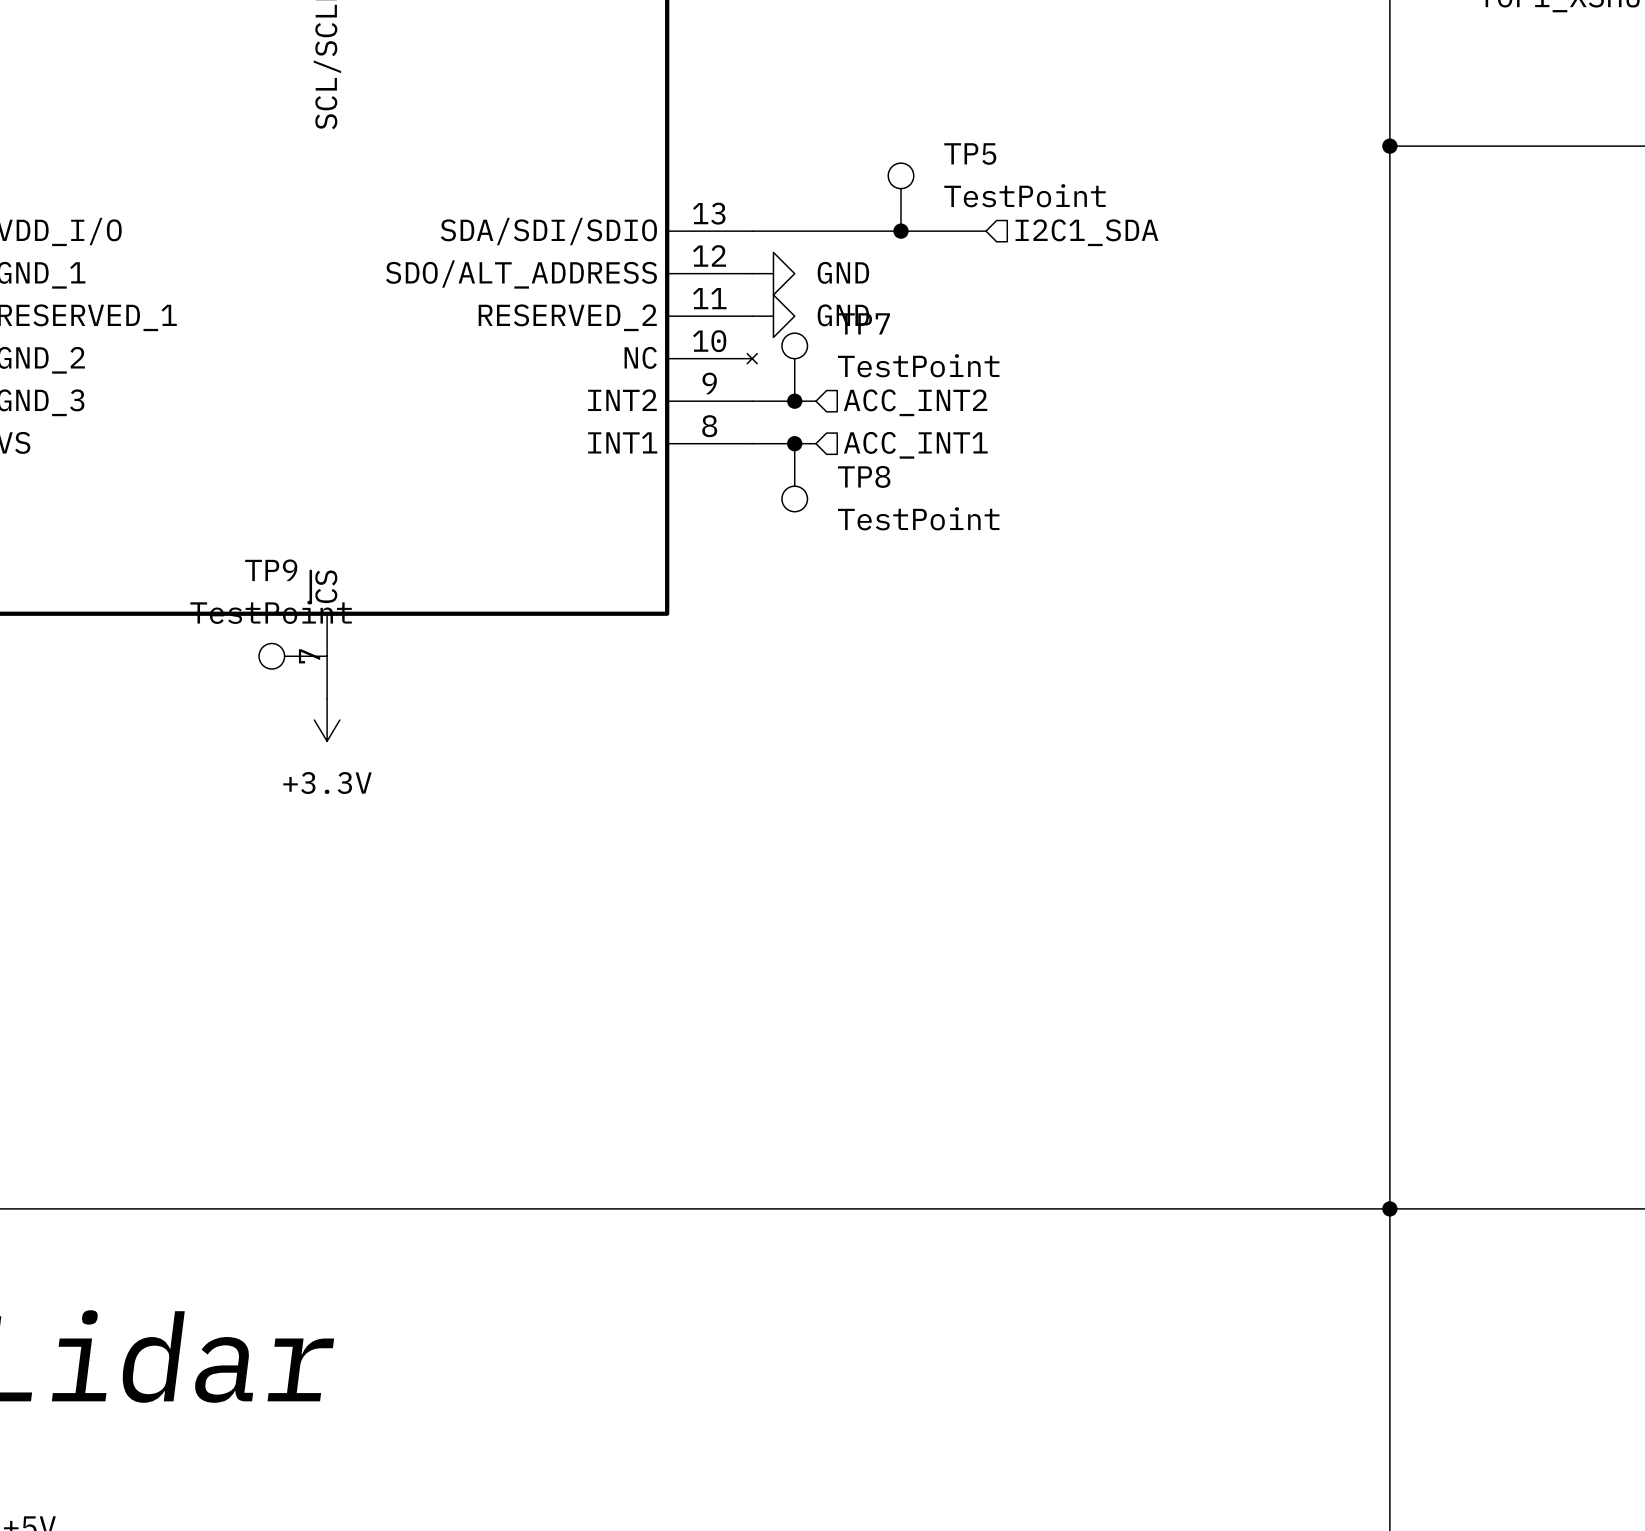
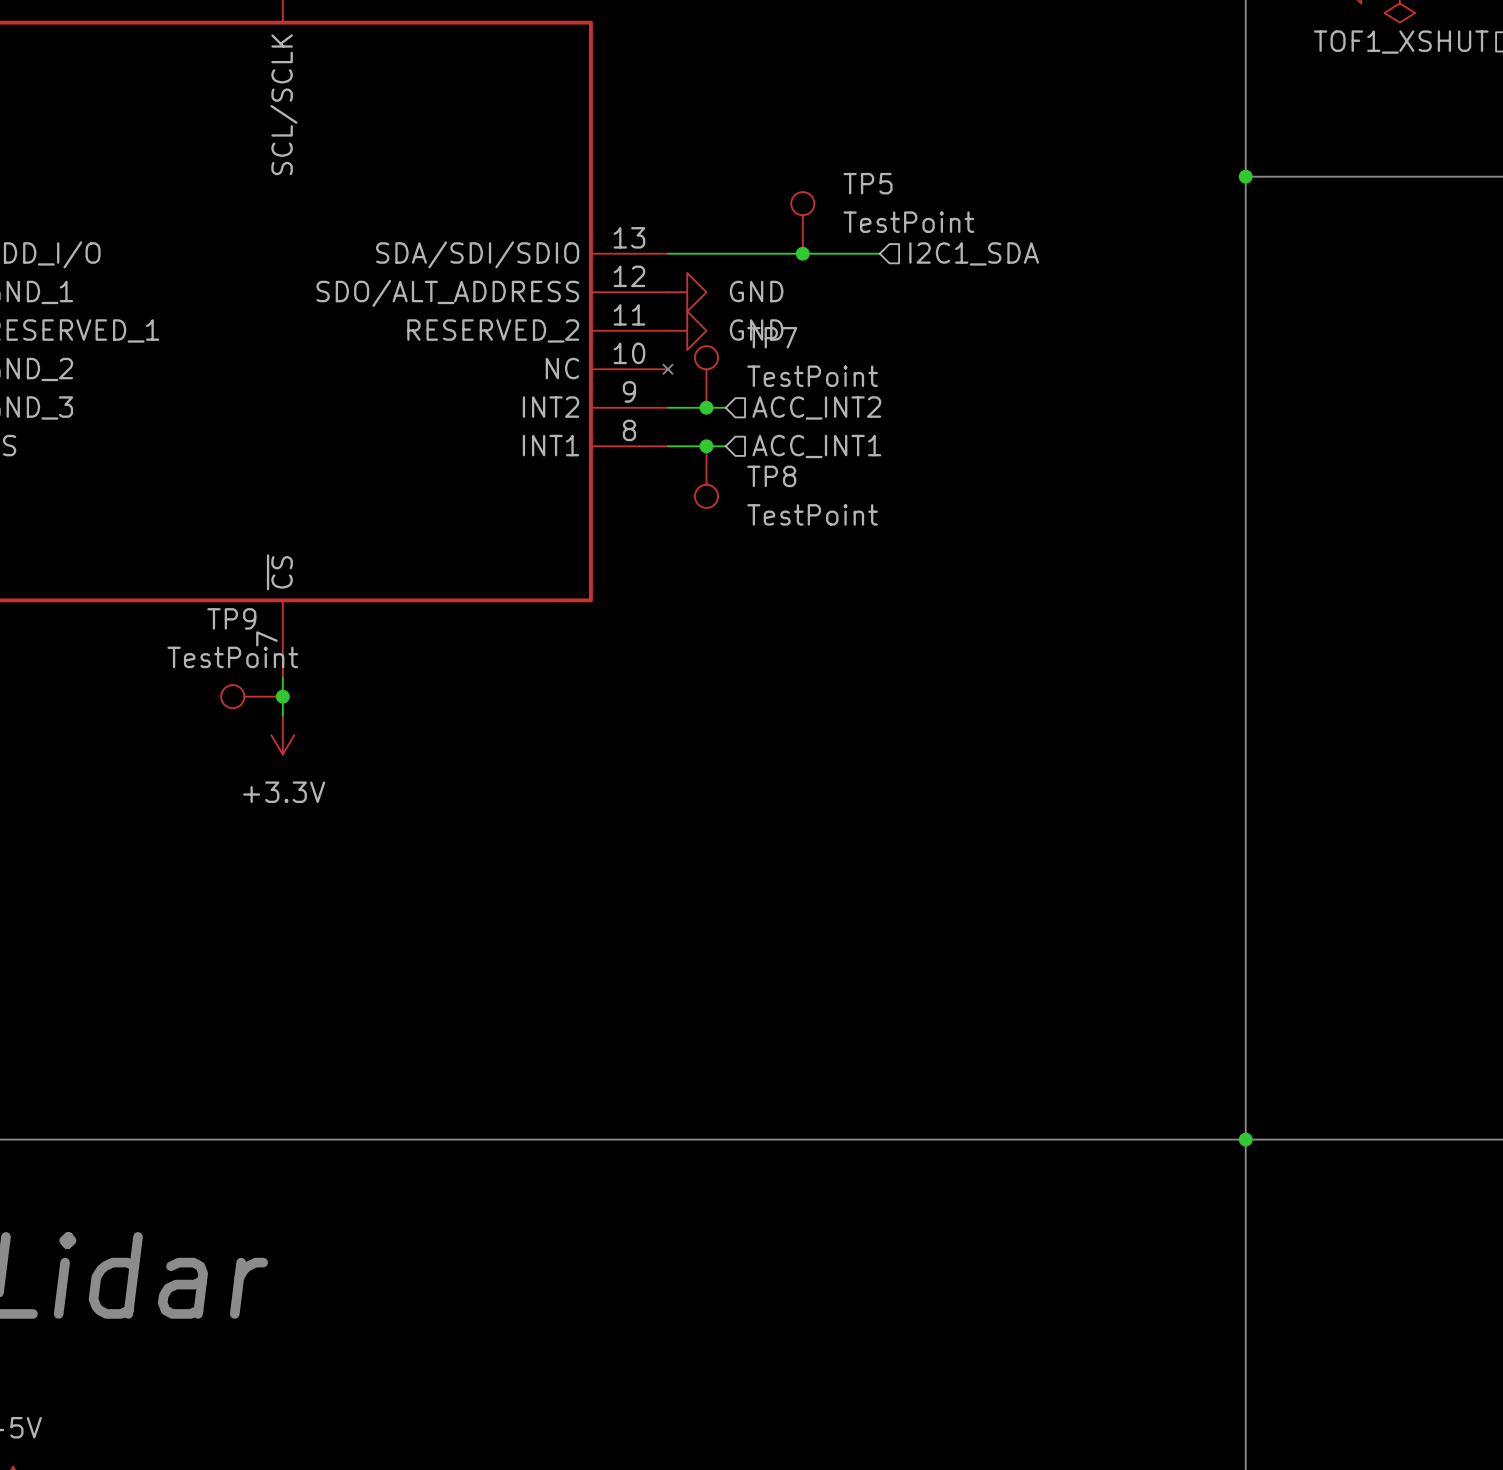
TP9 position: (293, 656) -> (252, 696)
power symbol position: +3.3V (327, 720) -> +3.3V (282, 735)
junction: none -> (282, 696)

